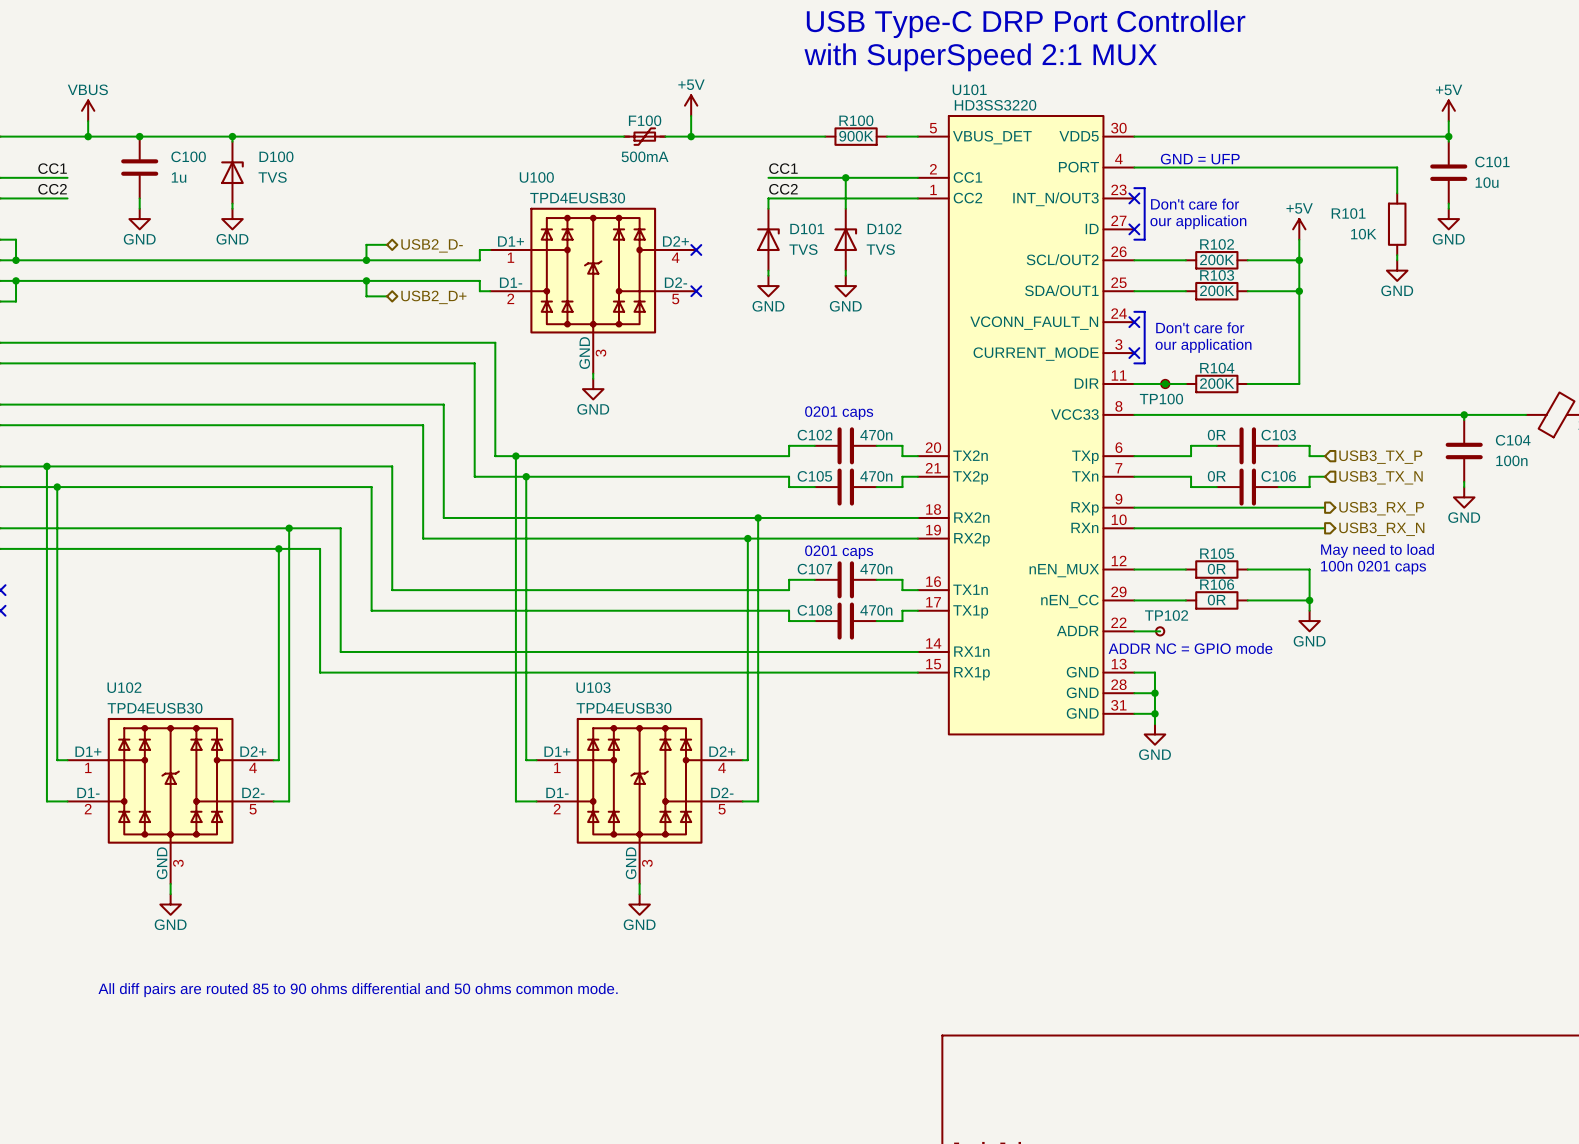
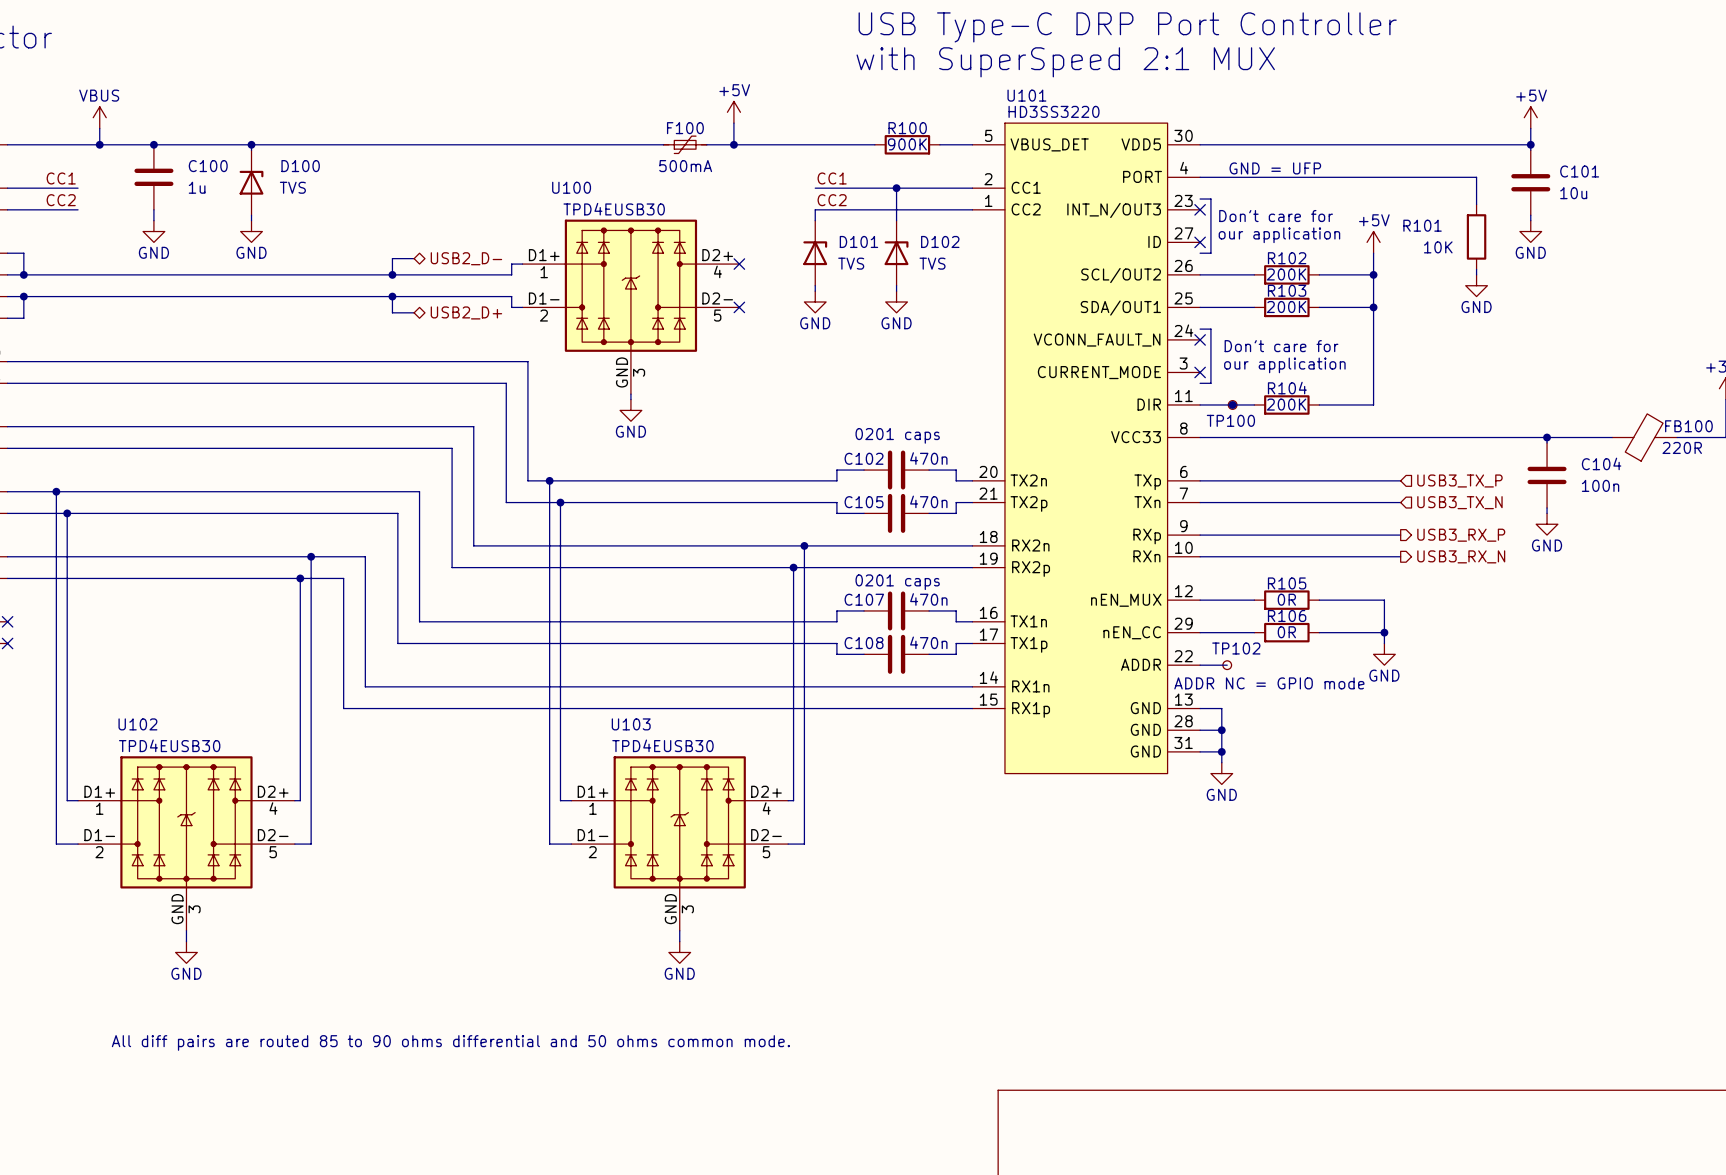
wire: (1216, 445) (1191, 445) (1191, 456) -> none
C103: 0R (1247, 445) -> none
wire: (1278, 445) (1309, 445) (1309, 456) -> (1259, 480) (1384, 480)
wire: (1191, 476) (1191, 487) (1216, 487) -> none
wire: (1309, 476) (1309, 487) (1278, 487) -> (1384, 502) (1259, 502)
C106: 0R (1247, 487) -> none
text: May need to load (1377, 550) -> none
text: 100n 0201 caps (1373, 567) -> none

